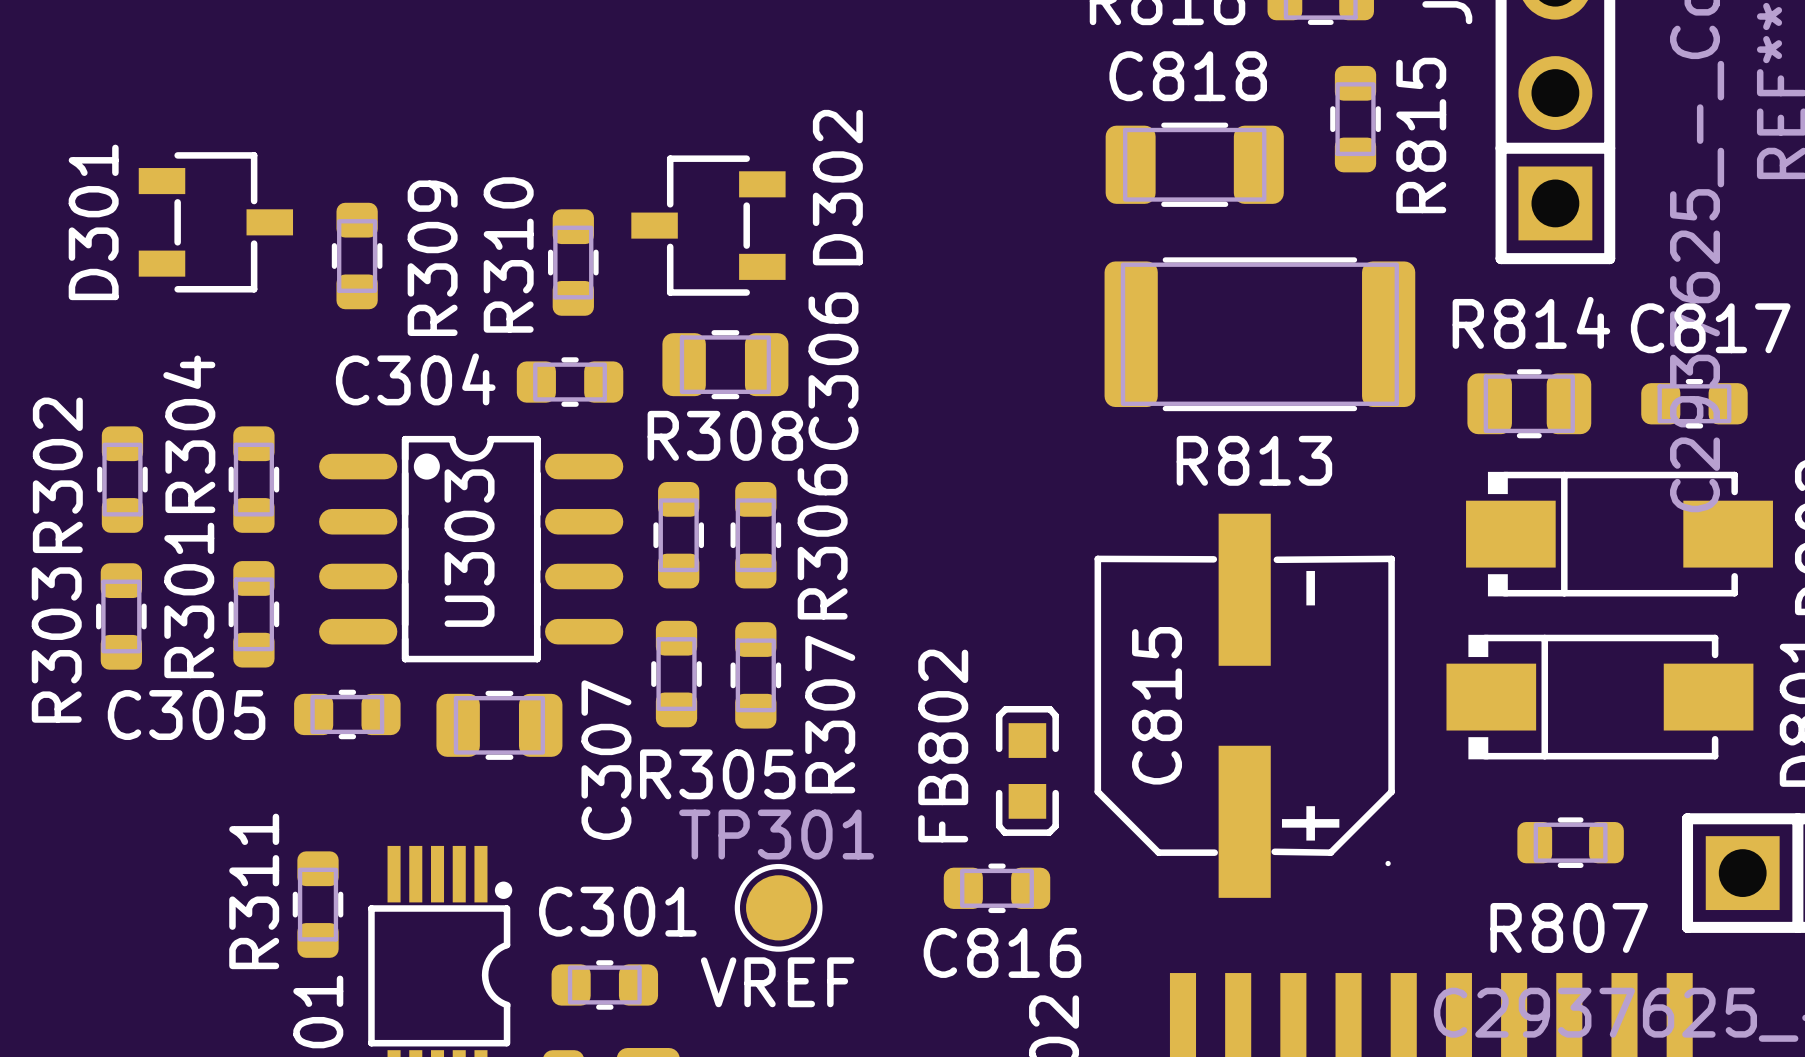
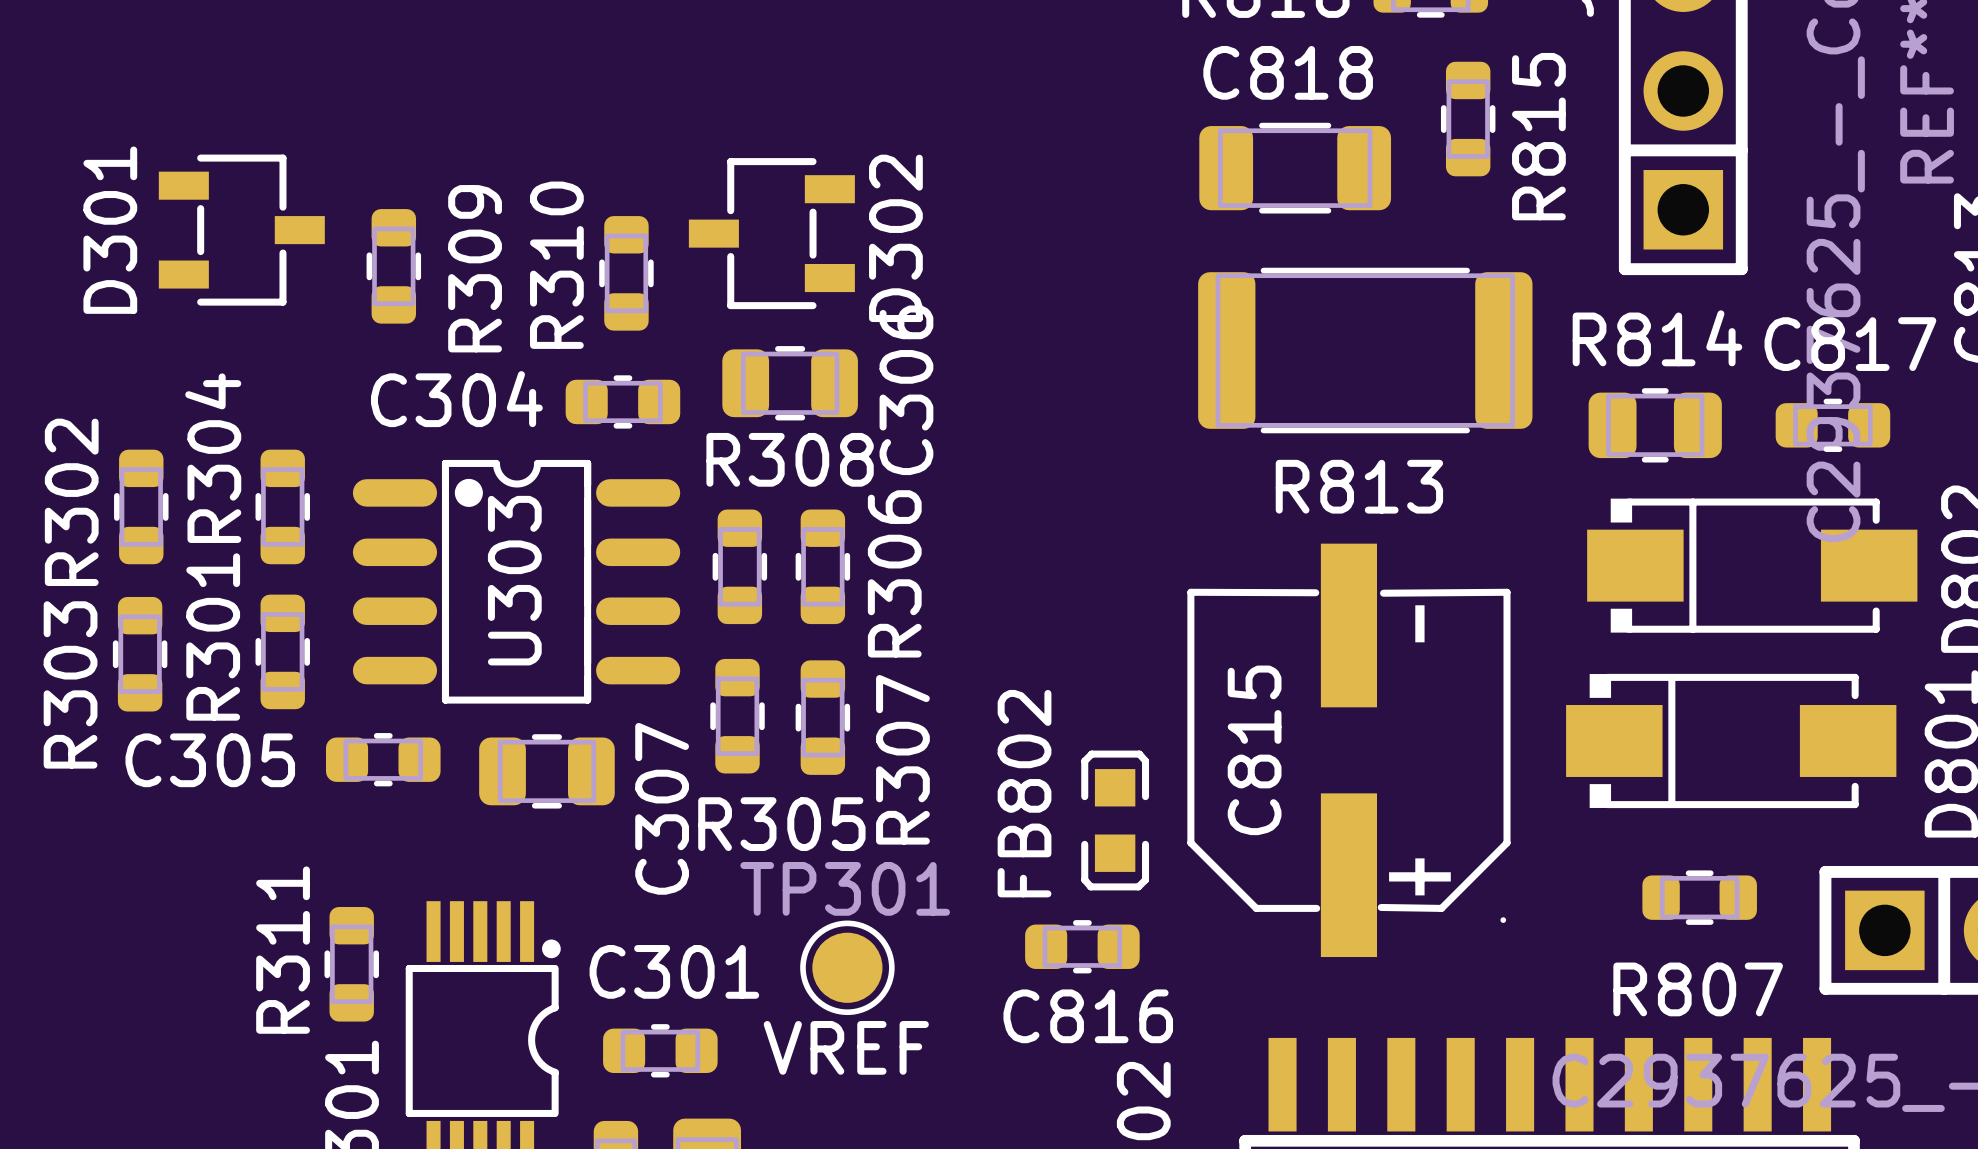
D302 name position: D302 (837, 187) -> D302 (895, 238)

